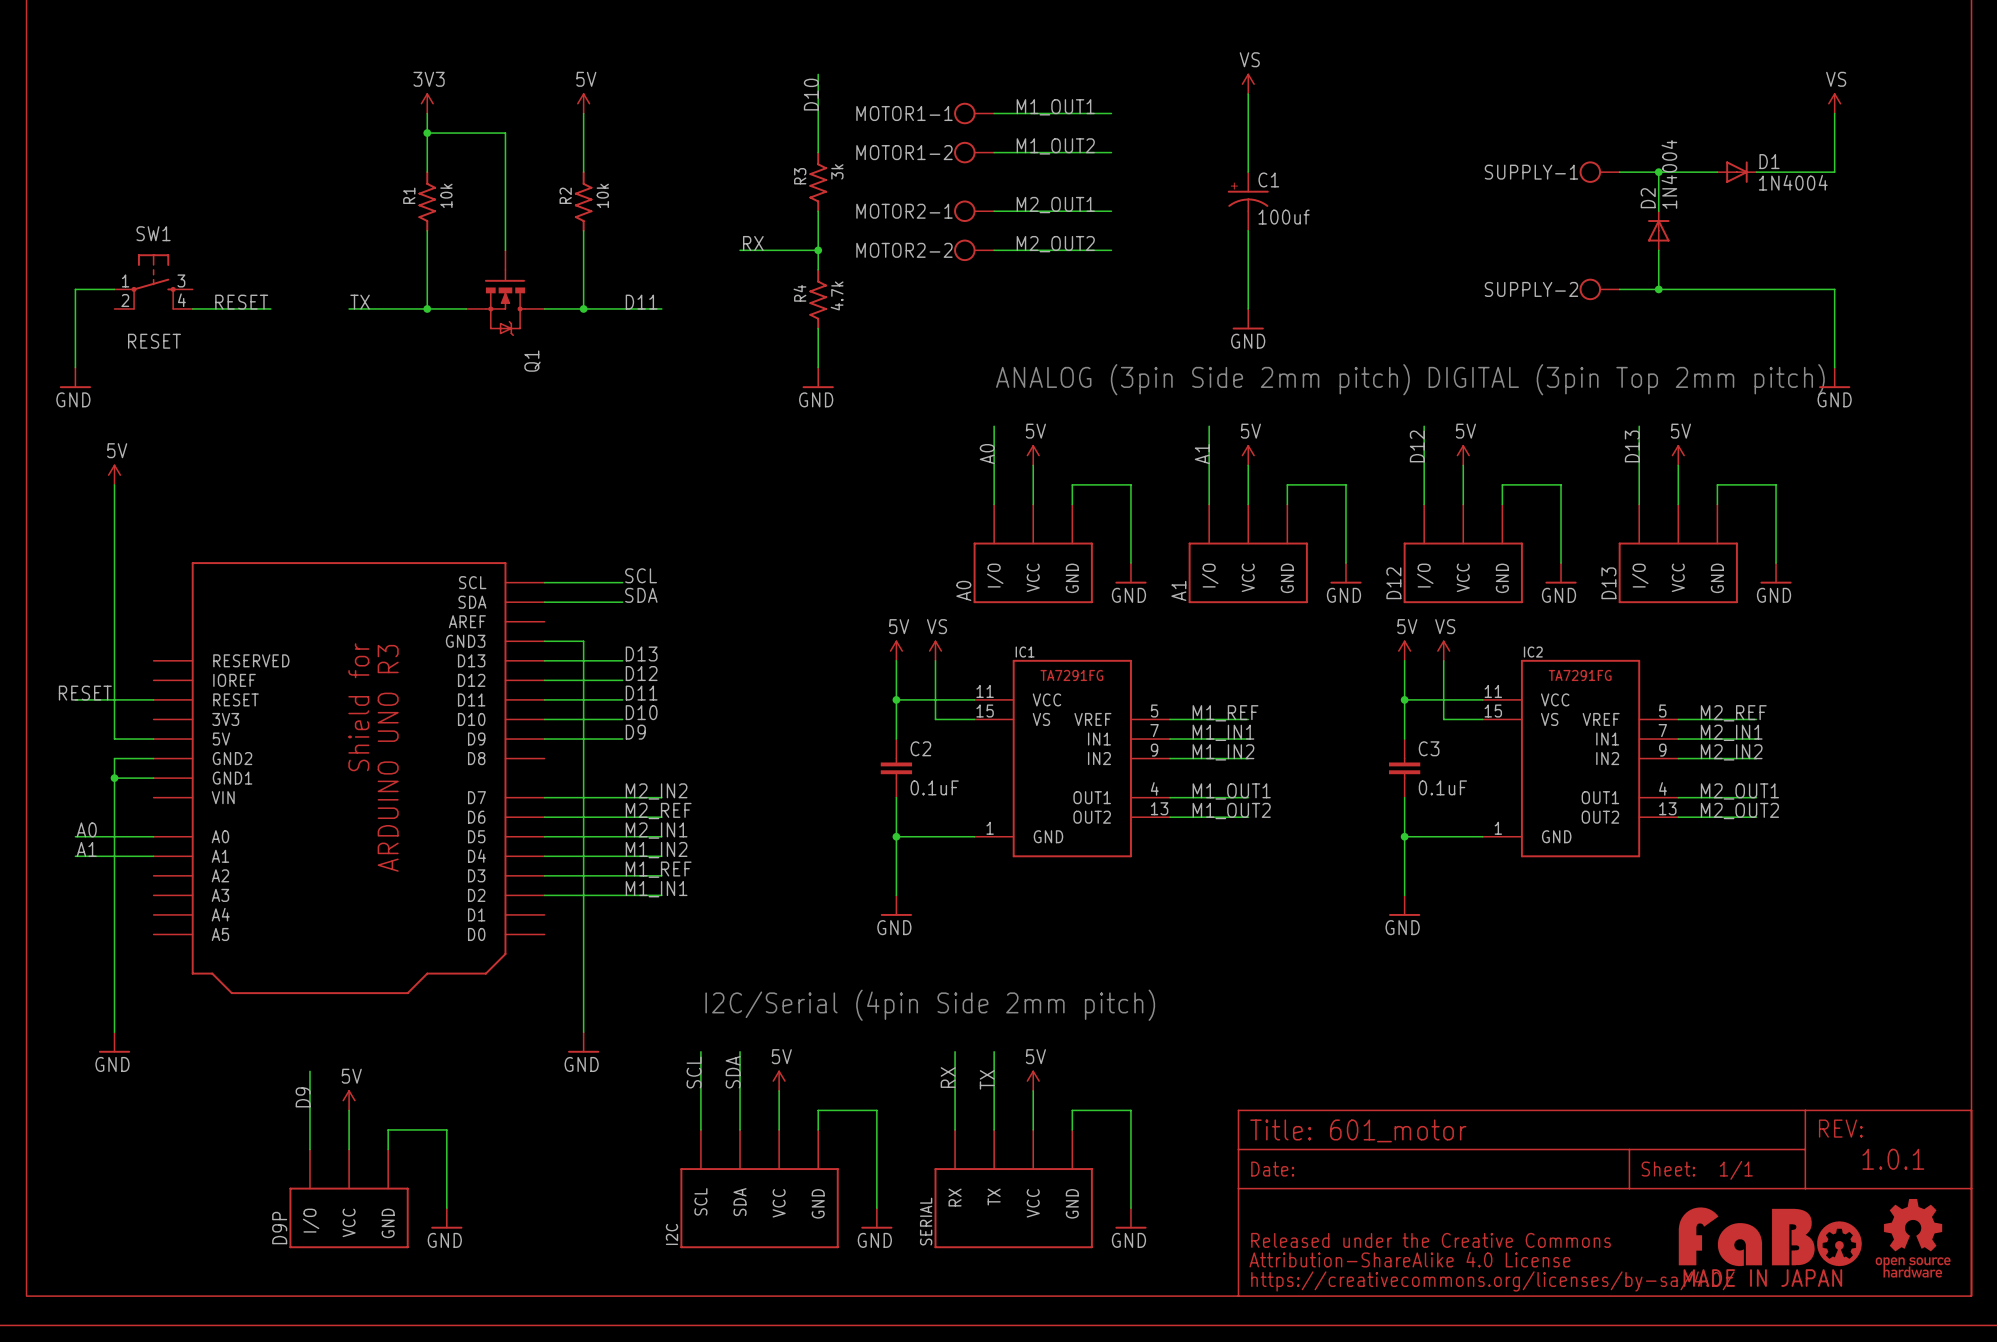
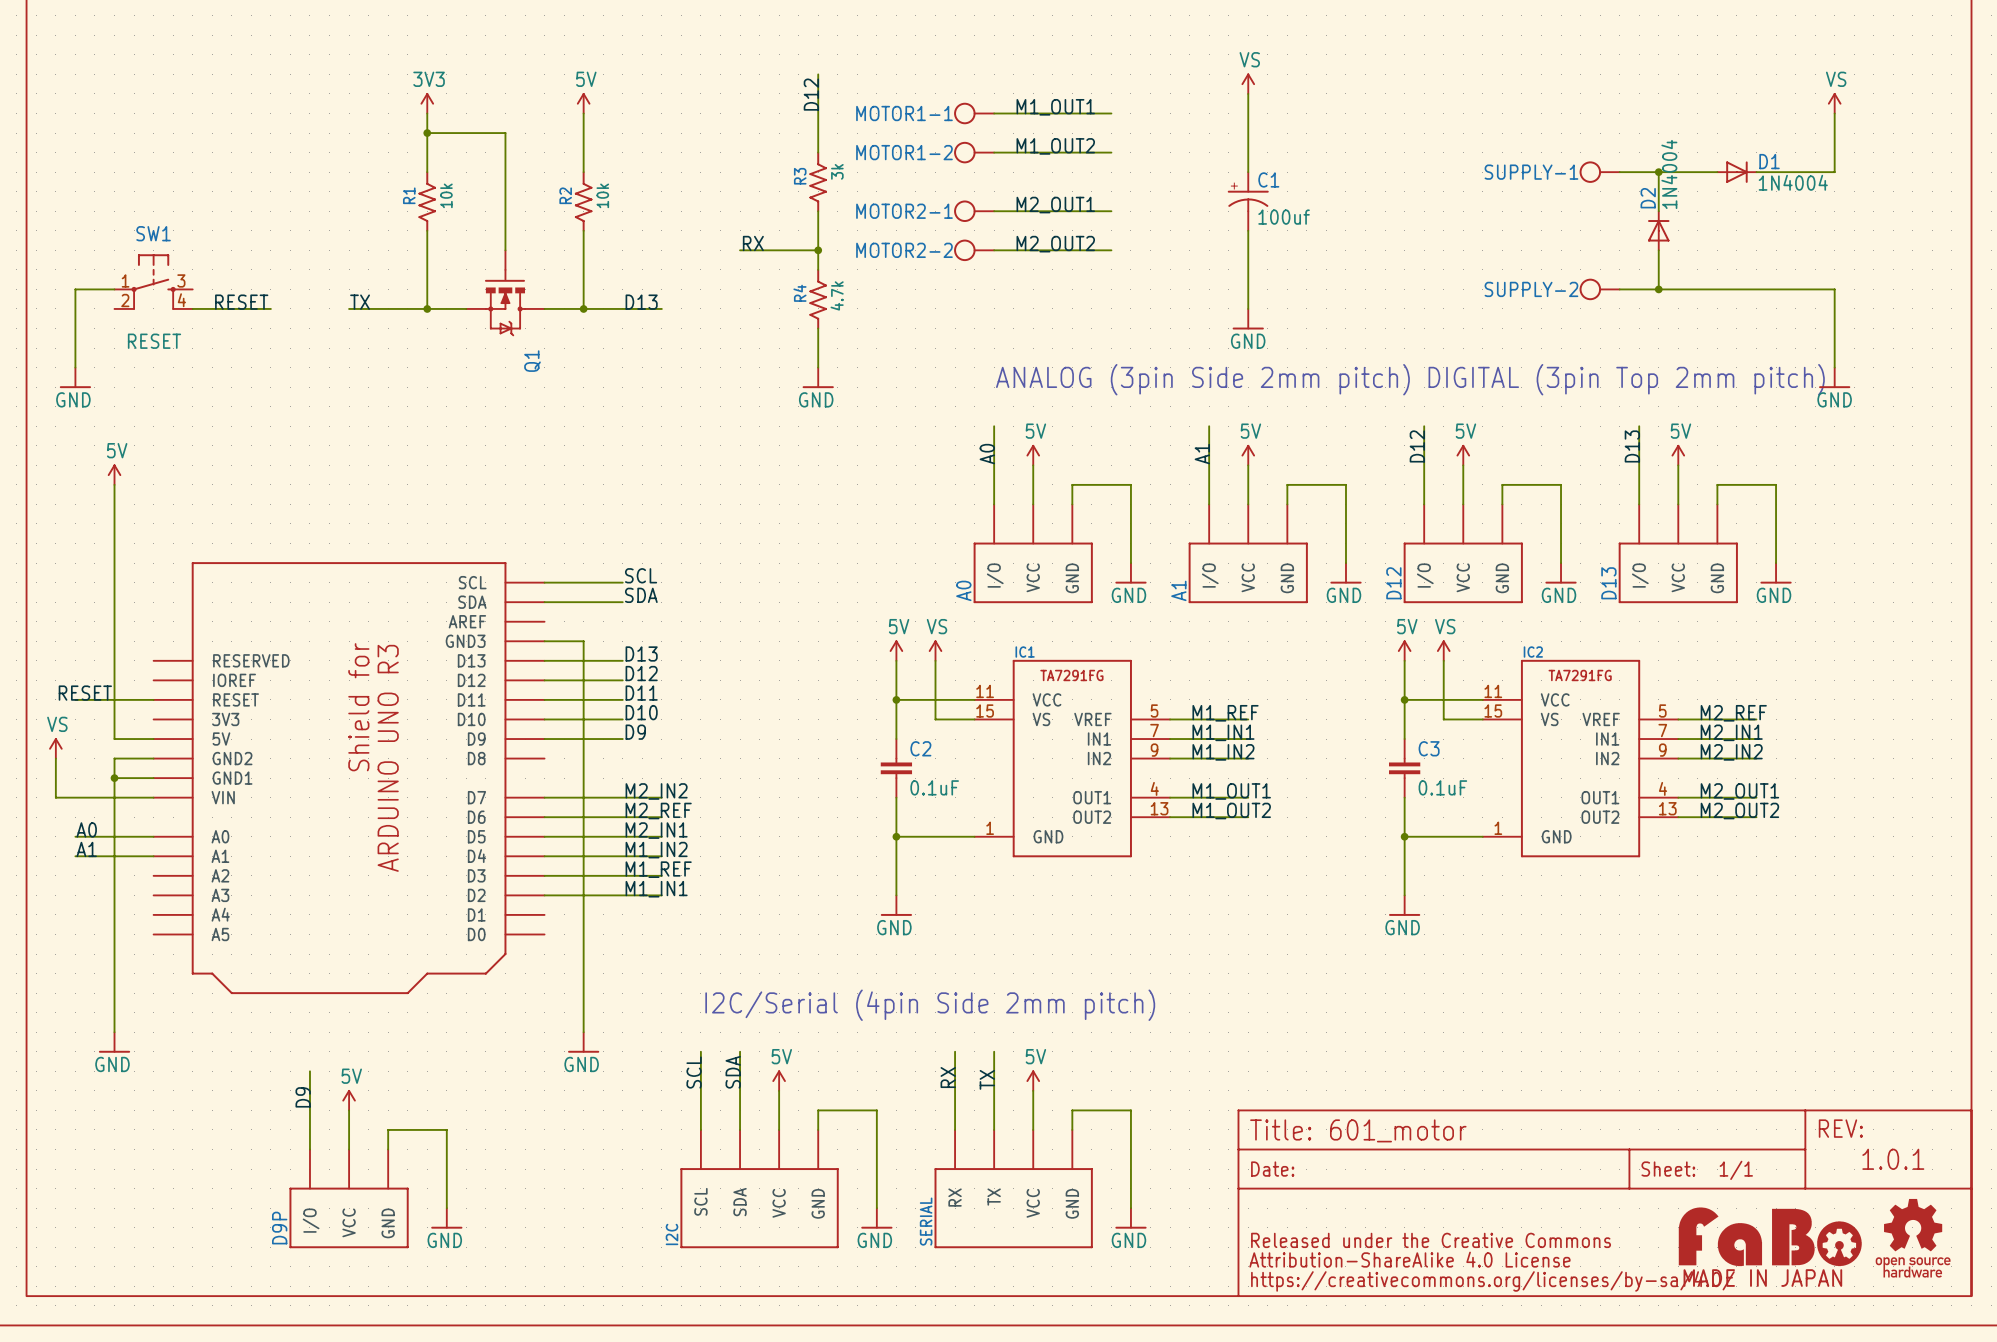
label: D10 (811, 94) -> D12 (811, 94)
label: D11 (641, 302) -> D13 (641, 302)
power symbol: none -> VS (55, 748)
wire: none -> (55, 758) (55, 797) (153, 797)

